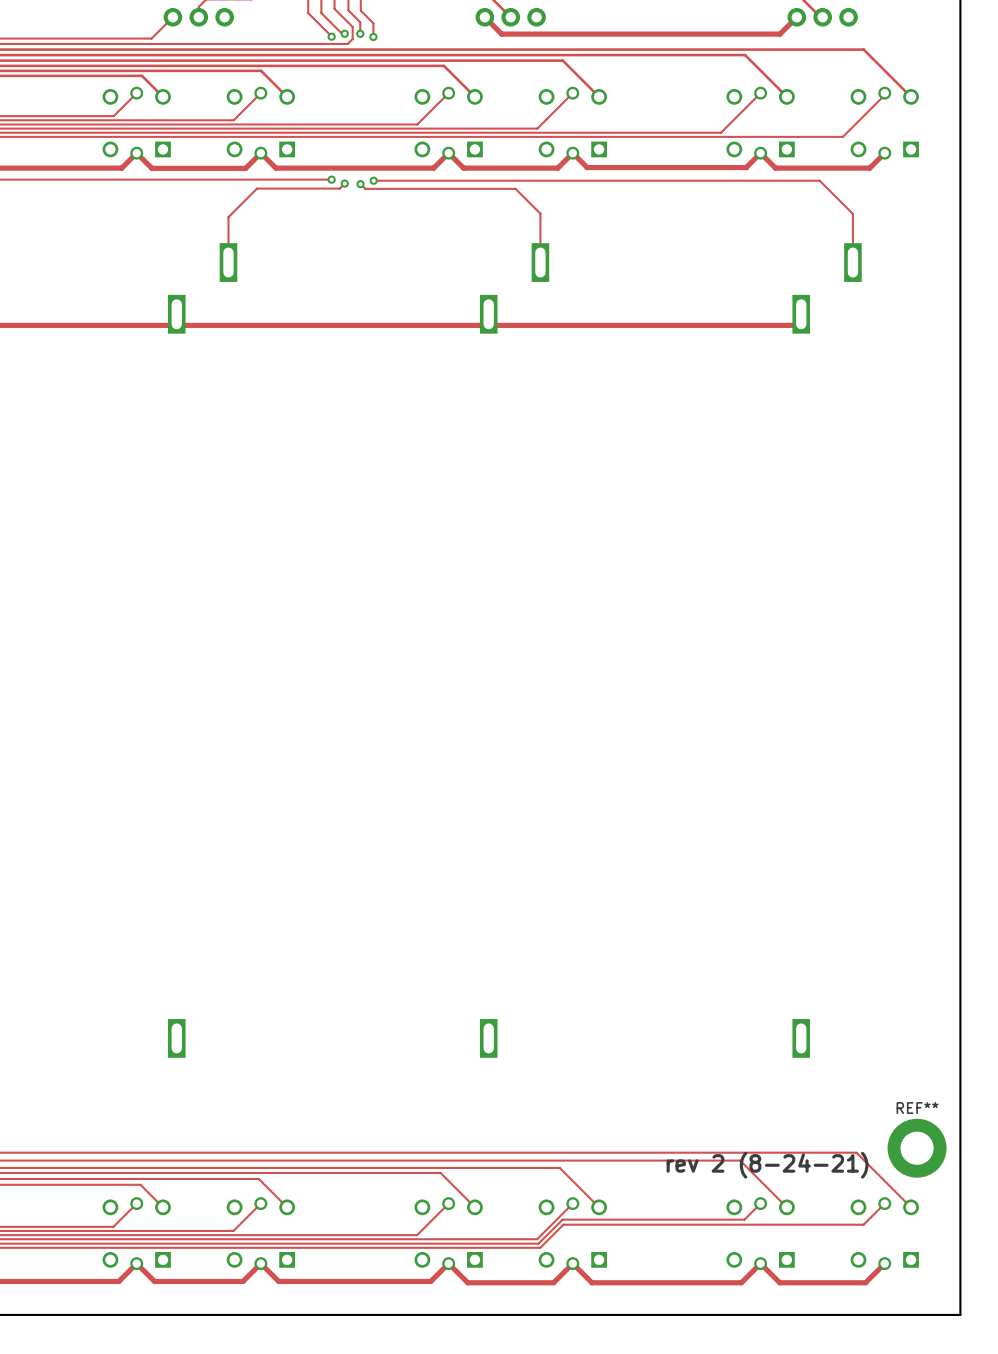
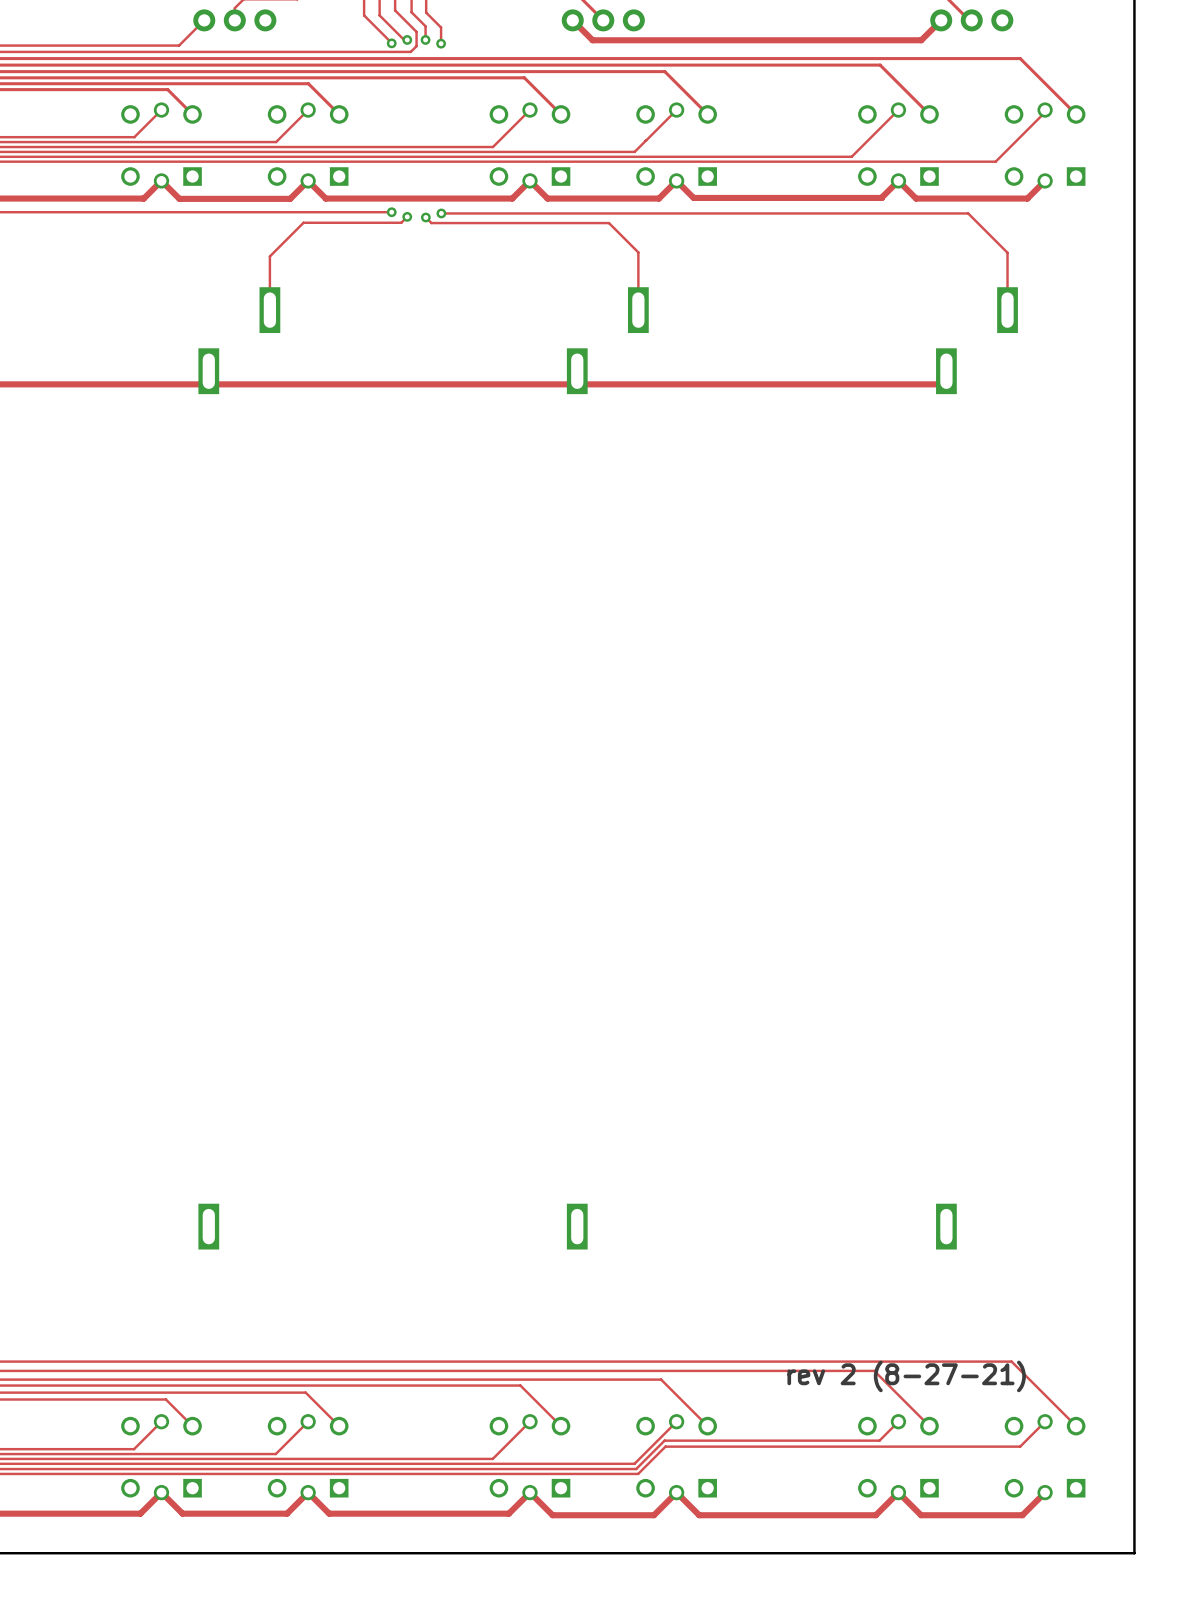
REF**: (917, 1148) -> none
text: rev 2 (8-24-21) (767, 1165) -> rev 2 (8-27-21) (906, 1376)

